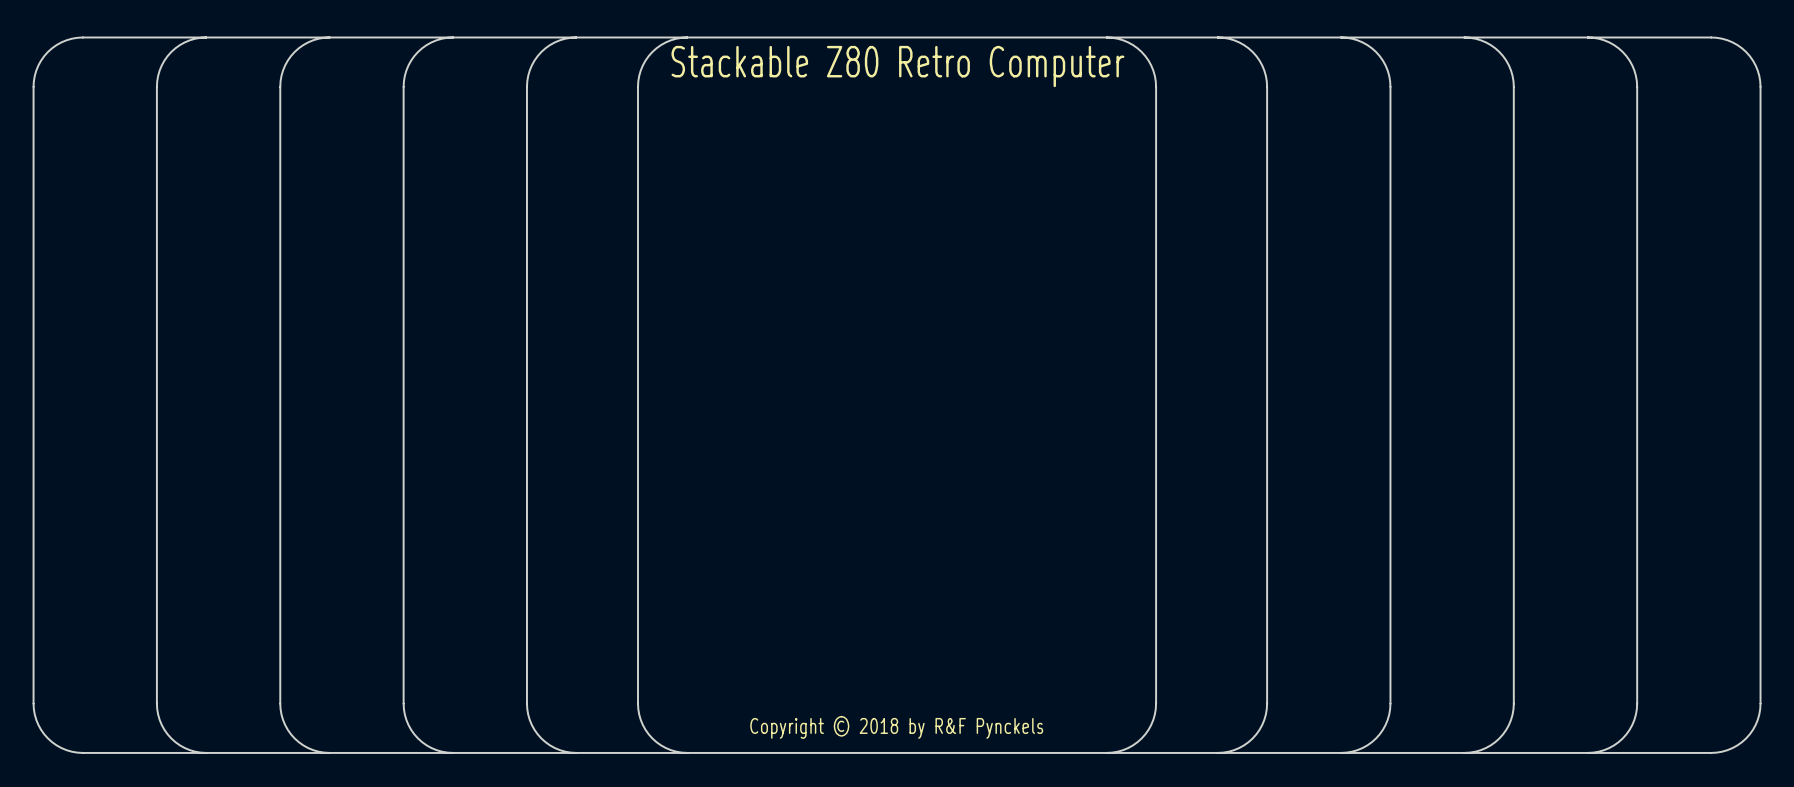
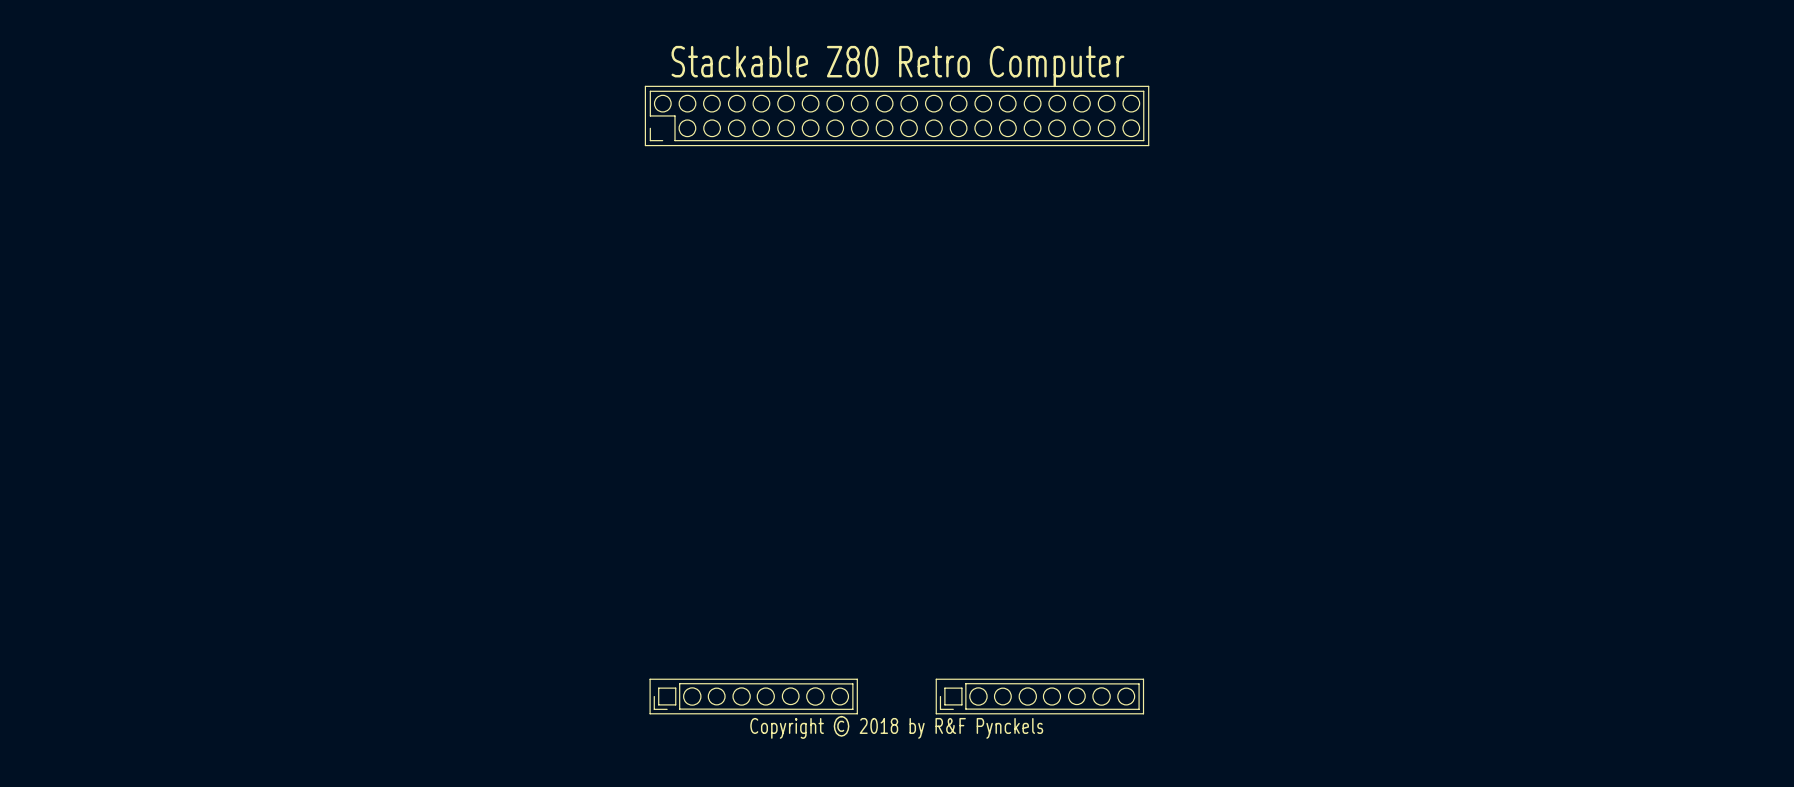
board edge: (82, 37) (1711, 37) (1727, 40) (1741, 48) (1752, 60) (1759, 75) (1760, 86) (1760, 703) (1757, 719) (1749, 734) (1737, 745) (1722, 751) (1711, 752) (82, 752) (66, 750) (52, 742) (41, 729) (34, 714) (33, 703) (33, 86) (38, 65) (48, 51) (66, 40) (82, 37) -> none
board edge: (206, 37) (184, 42) (171, 51) (161, 65) (156, 86) (157, 709) (161, 725) (175, 742) (189, 750) (206, 752) -> none
board edge: (329, 37) (308, 42) (294, 51) (285, 65) (280, 86) (280, 709) (285, 725) (298, 742) (313, 750) (329, 752) -> none
board edge: (452, 37) (431, 42) (418, 51) (408, 65) (403, 86) (403, 709) (408, 725) (422, 742) (436, 750) (452, 752) -> none
board edge: (576, 37) (554, 42) (541, 51) (531, 65) (526, 86) (527, 709) (531, 725) (545, 742) (560, 750) (576, 752) -> none
board edge: (687, 37) (665, 42) (652, 51) (642, 65) (638, 81) (637, 703) (640, 719) (652, 738) (665, 748) (687, 752) -> none
board edge: (1106, 37) (1123, 40) (1141, 51) (1151, 65) (1156, 86) (1155, 709) (1151, 725) (1141, 738) (1128, 748) (1106, 752) -> none
board edge: (1217, 37) (1234, 40) (1252, 51) (1262, 65) (1267, 86) (1266, 709) (1262, 725) (1252, 738) (1239, 748) (1217, 752) -> none
board edge: (1341, 37) (1362, 42) (1376, 51) (1387, 70) (1390, 86) (1390, 709) (1385, 725) (1376, 738) (1362, 748) (1341, 752) -> none
board edge: (1464, 37) (1480, 40) (1499, 51) (1508, 65) (1513, 86) (1513, 709) (1508, 725) (1499, 738) (1485, 748) (1464, 752) -> none
board edge: (1587, 37) (1604, 40) (1622, 51) (1632, 65) (1637, 86) (1636, 709) (1632, 725) (1622, 738) (1609, 748) (1587, 752) -> none
line: none -> (645, 86) (1148, 86) (1148, 145) (645, 145) (645, 86)
line: none -> (650, 91) (650, 115) (675, 115) (675, 140) (1143, 140) (1143, 91) (650, 91)
drawing: none -> [654, 94, 1141, 138]
line: none -> (650, 128) (650, 140) (662, 140)
line: none -> (650, 679) (857, 679) (857, 713) (650, 713) (650, 679)
line: none -> (936, 679) (1143, 679) (1143, 713) (936, 713) (936, 679)
line: none -> (679, 683) (679, 709) (852, 709) (852, 683) (679, 683)
line: none -> (965, 683) (1139, 683) (1139, 709) (965, 709) (965, 683)
drawing: none -> [683, 687, 849, 706]
drawing: none -> [969, 687, 1136, 706]
line: none -> (658, 688) (675, 688) (675, 704) (658, 704) (658, 688)
line: none -> (944, 688) (961, 688) (961, 704) (944, 704) (944, 688)
line: none -> (654, 696) (654, 709) (667, 709)
line: none -> (940, 696) (940, 709) (953, 709)

